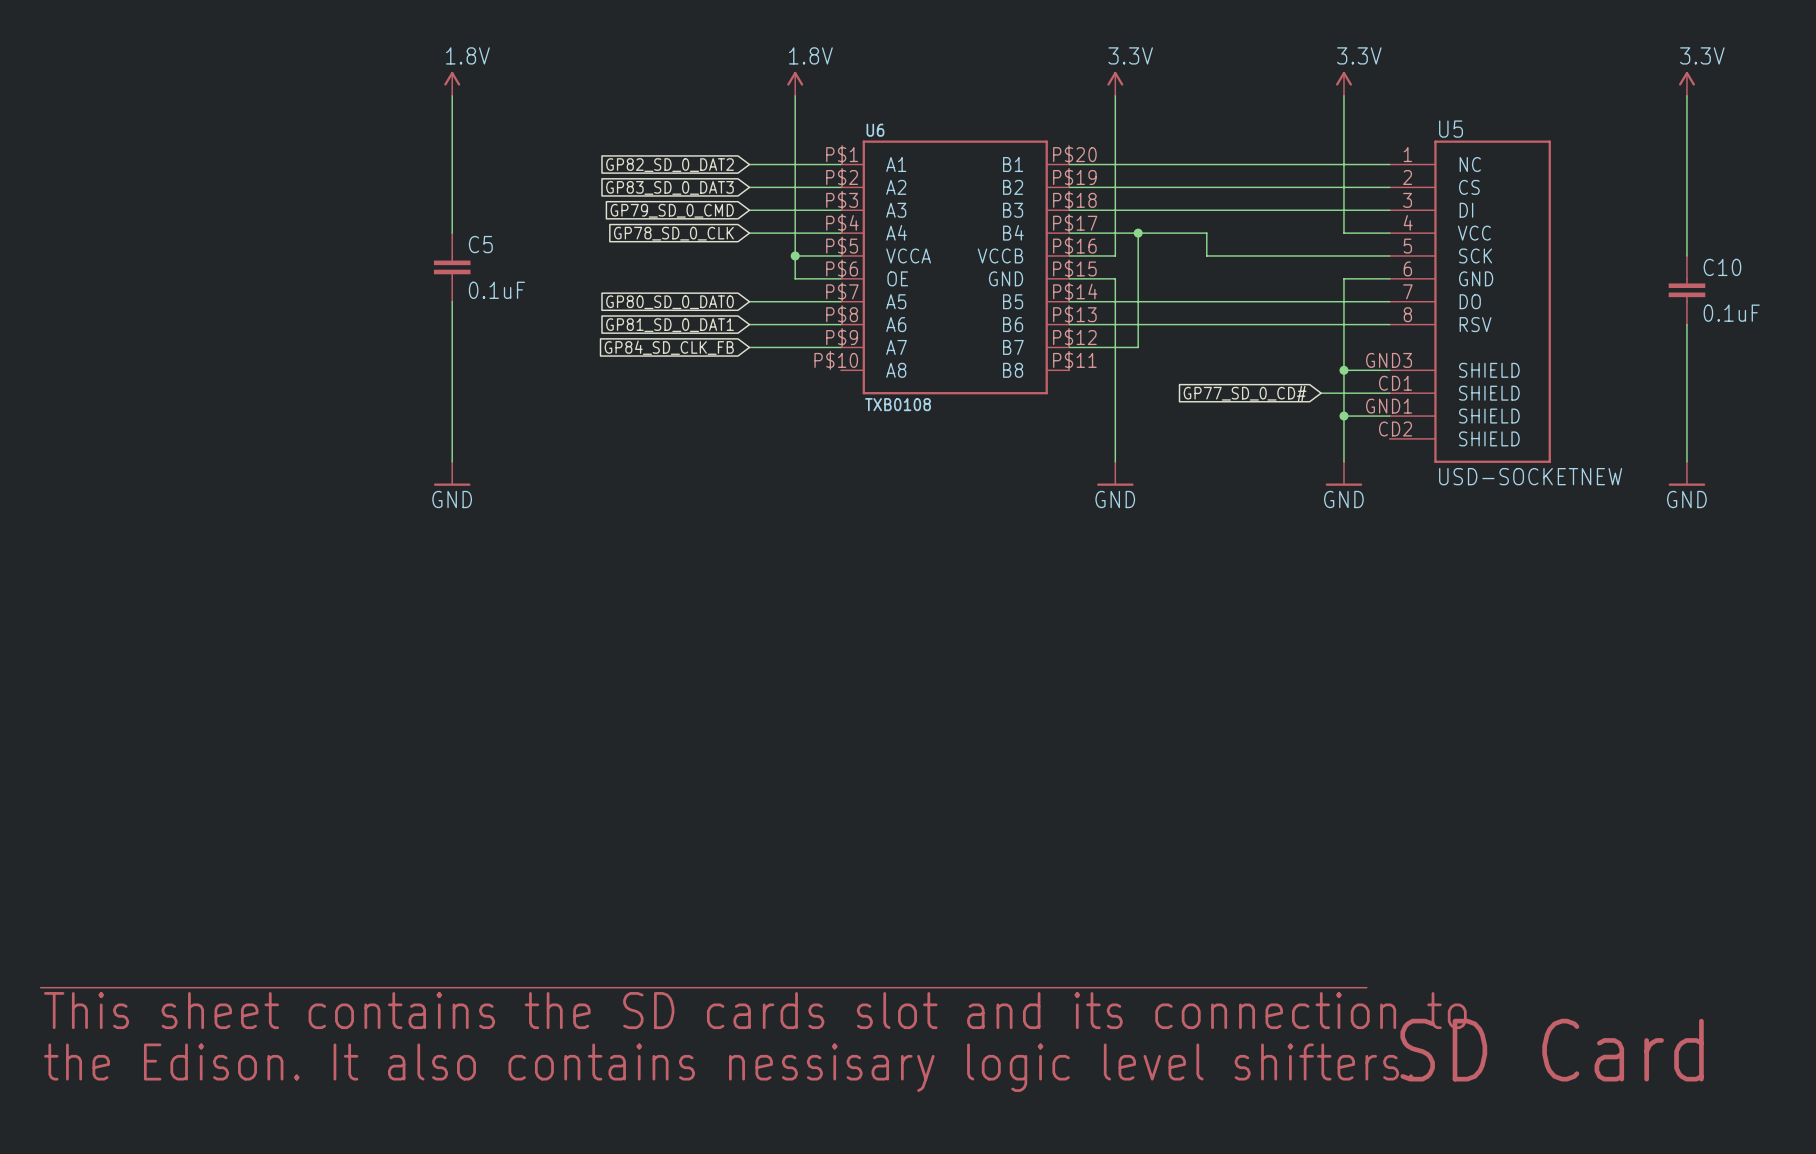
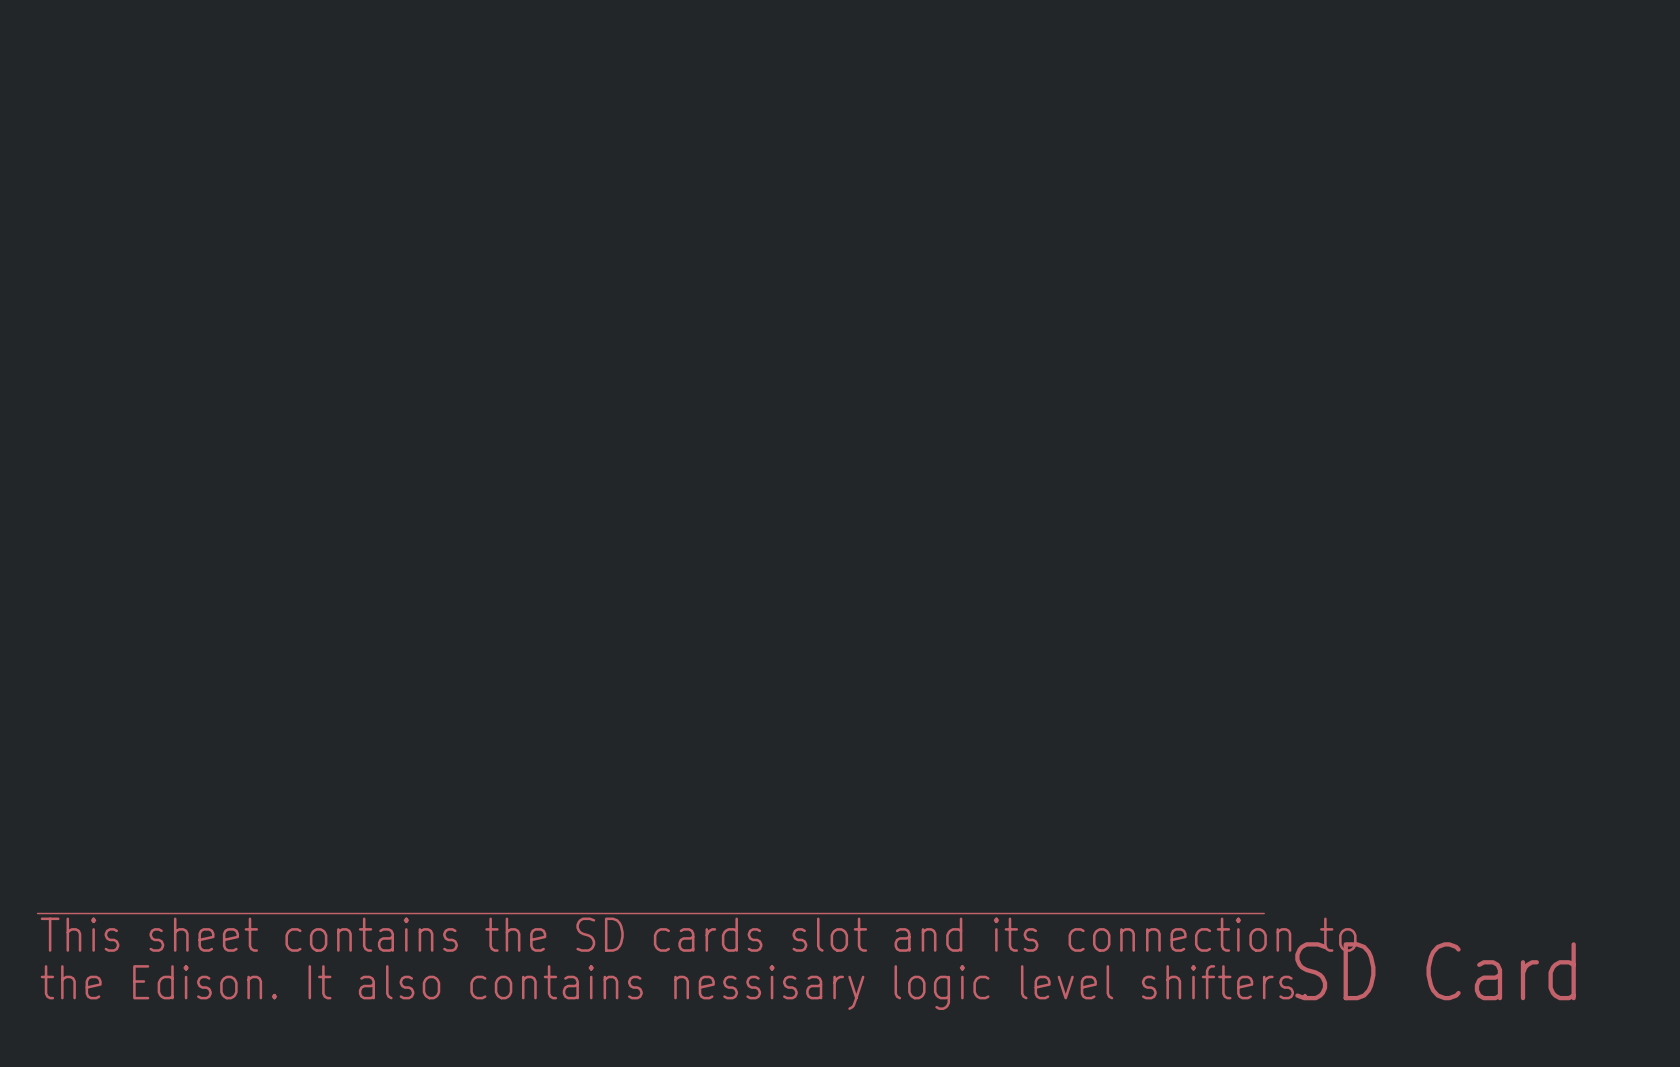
power symbol: 1.8V (452, 83) -> none
power symbol: 1.8V (795, 83) -> none
power symbol: 3.3V (1115, 83) -> none
power symbol: 3.3V (1343, 83) -> none
power symbol: 3.3V (1686, 83) -> none
wire: (452, 95) (452, 233) -> none
wire: (795, 95) (795, 278) (840, 278) -> none
wire: (1115, 95) (1115, 255) (1069, 255) -> none
wire: (1343, 95) (1343, 233) (1389, 233) -> none
wire: (1686, 95) (1686, 255) -> none
wire: (749, 164) (840, 164) -> none
wire: (1069, 164) (1389, 164) -> none
global label: GP82_SD_0_DAT2 (669, 165) -> none
global label: GP83_SD_0_DAT3 (669, 187) -> none
wire: (749, 187) (840, 187) -> none
wire: (1069, 187) (1389, 187) -> none
global label: GP79_SD_0_CMD (672, 210) -> none
wire: (749, 210) (840, 210) -> none
wire: (1069, 210) (1389, 210) -> none
global label: GP78_SD_0_CLK (673, 233) -> none
wire: (749, 233) (840, 233) -> none
wire: (1069, 233) (1206, 233) (1206, 255) (1389, 255) -> none
wire: (1138, 233) (1138, 347) (1069, 347) -> none
junction: (1138, 233) -> none
wire: (795, 255) (840, 255) -> none
junction: (795, 255) -> none
C5: 0.1uF (452, 267) -> none
U6: TXB0108 (955, 267) -> none
wire: (1069, 278) (1115, 278) (1115, 461) -> none
wire: (1389, 278) (1343, 278) (1343, 461) -> none
C10: 0.1uF (1686, 290) -> none
wire: (452, 301) (452, 461) -> none
wire: (749, 301) (840, 301) -> none
wire: (1069, 301) (1389, 301) -> none
U5: USD-SOCKETNEW (1470, 301) -> none
global label: GP80_SD_0_DAT0 (669, 302) -> none
wire: (749, 324) (840, 324) -> none
wire: (1069, 324) (1389, 324) -> none
wire: (1686, 324) (1686, 461) -> none
global label: GP81_SD_0_DAT1 (669, 325) -> none
global label: GP84_SD_CLK_FB (669, 347) -> none
wire: (749, 347) (840, 347) -> none
wire: (1343, 370) (1389, 370) -> none
junction: (1343, 370) -> none
global label: GP77_SD_0_CD# (1245, 393) -> none
wire: (1321, 393) (1389, 393) -> none
wire: (1343, 416) (1389, 416) -> none
junction: (1343, 416) -> none
power symbol: GND (452, 473) -> none
power symbol: GND (1115, 473) -> none
power symbol: GND (1343, 473) -> none
power symbol: GND (1686, 473) -> none

